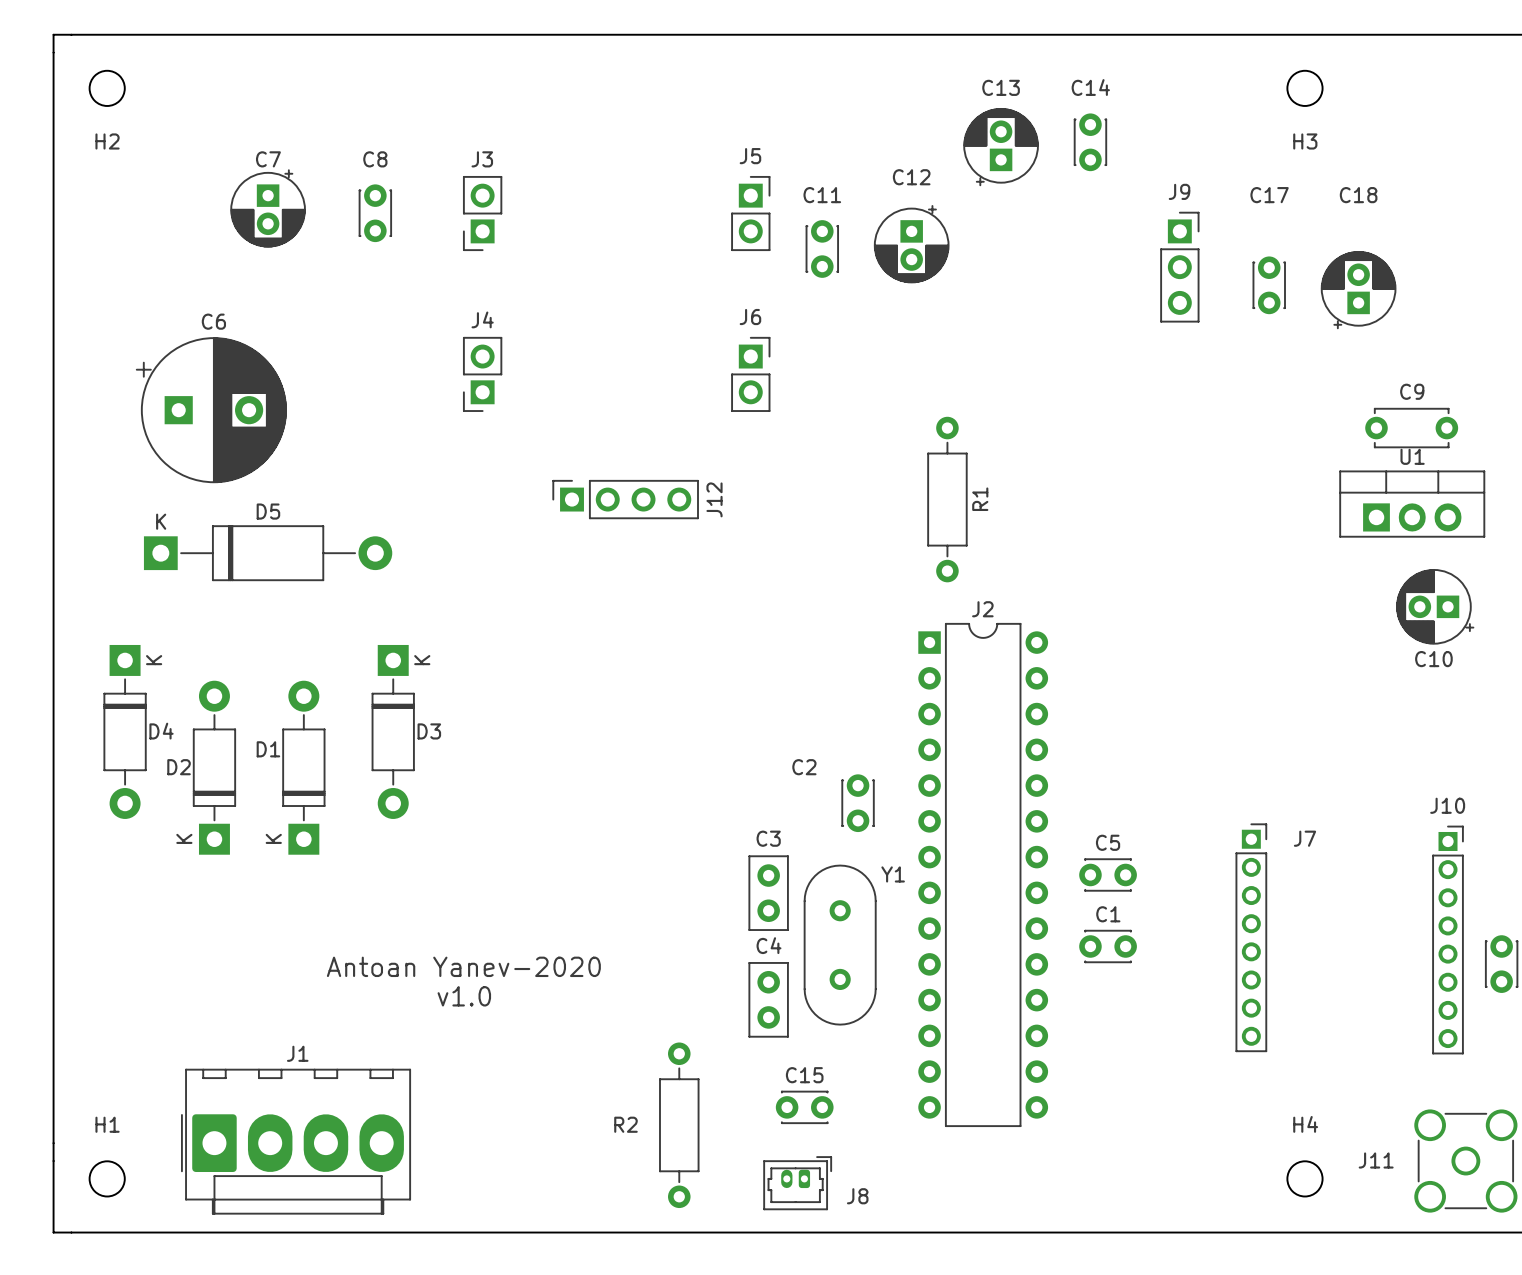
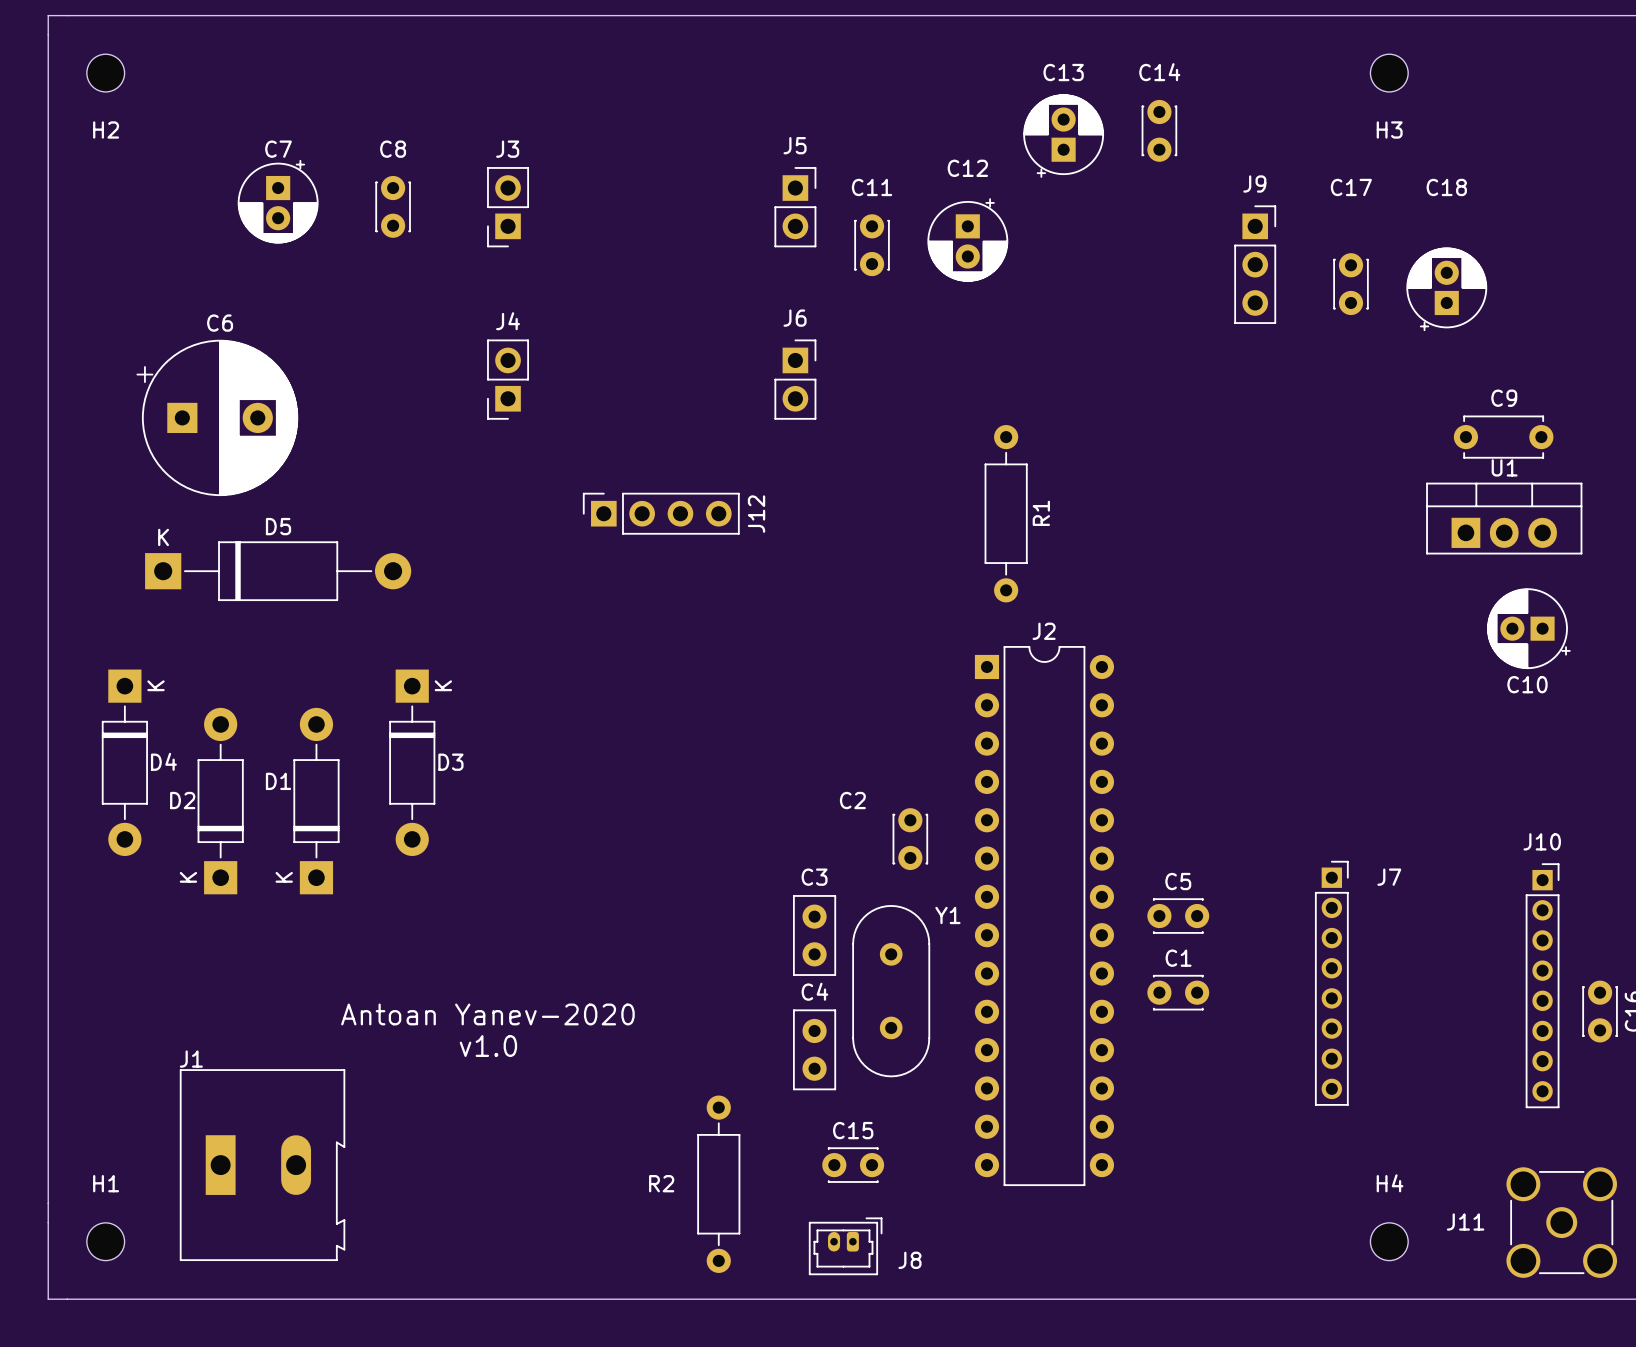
J1 name position: J1 (297, 1053) -> J1 (191, 1059)
J1 footprint: [181, 1068, 411, 1215] -> [179, 1069, 346, 1262]

